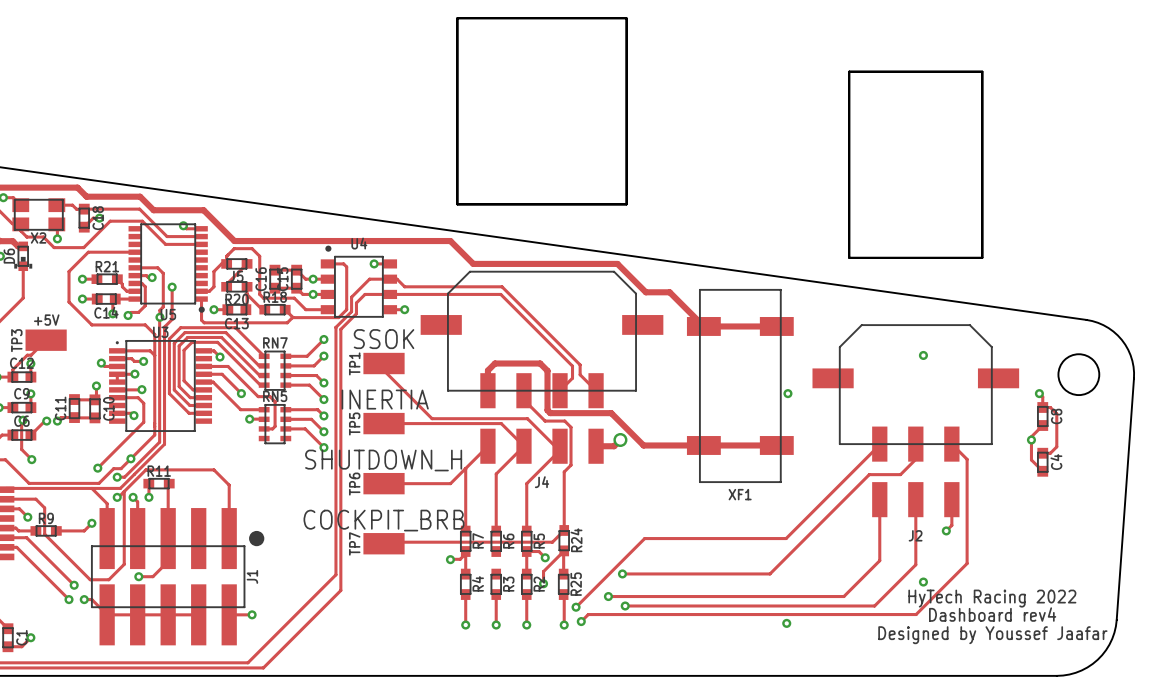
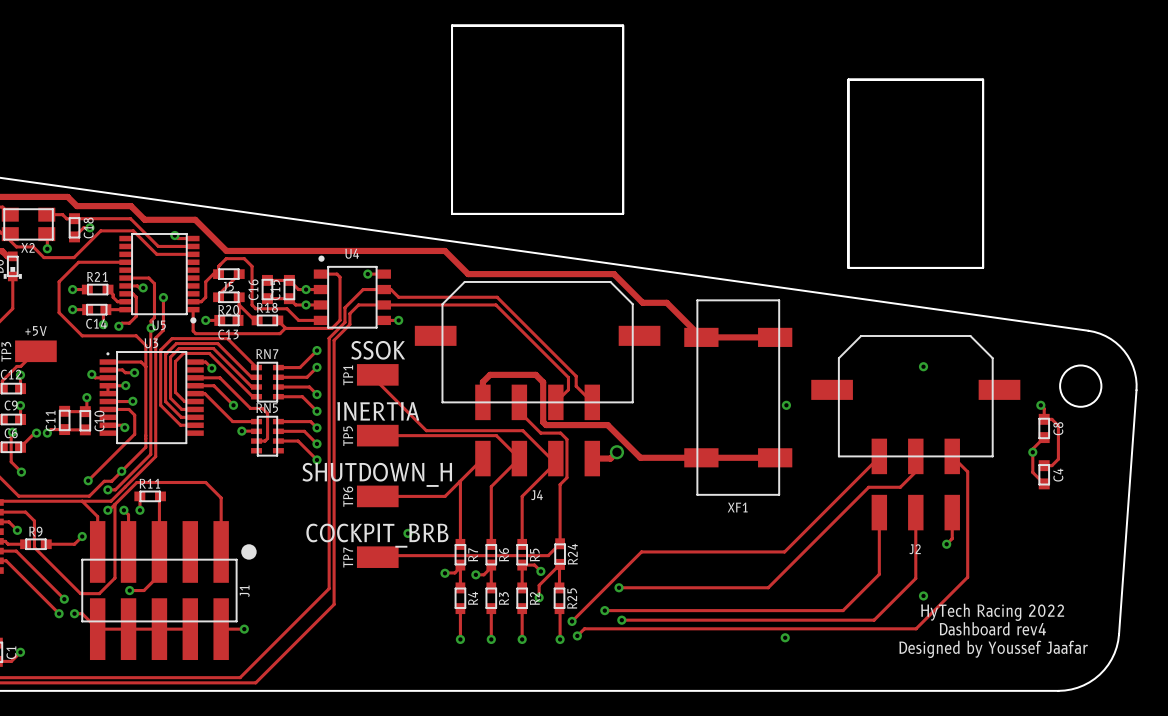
via: none -> (407, 533)
track: none -> (491, 565) (491, 587)
track: none -> (491, 567) (483, 574) (475, 574)
via: none -> (475, 574)

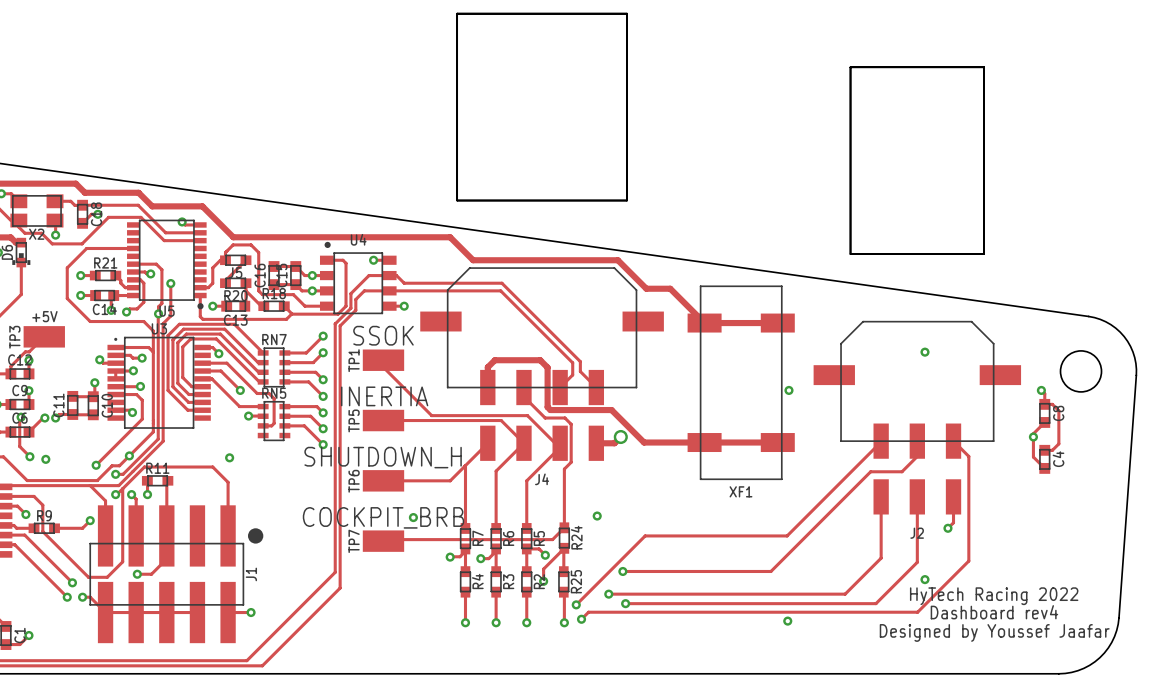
via: none -> (229, 457)
via: none -> (45, 459)
via: none -> (597, 516)

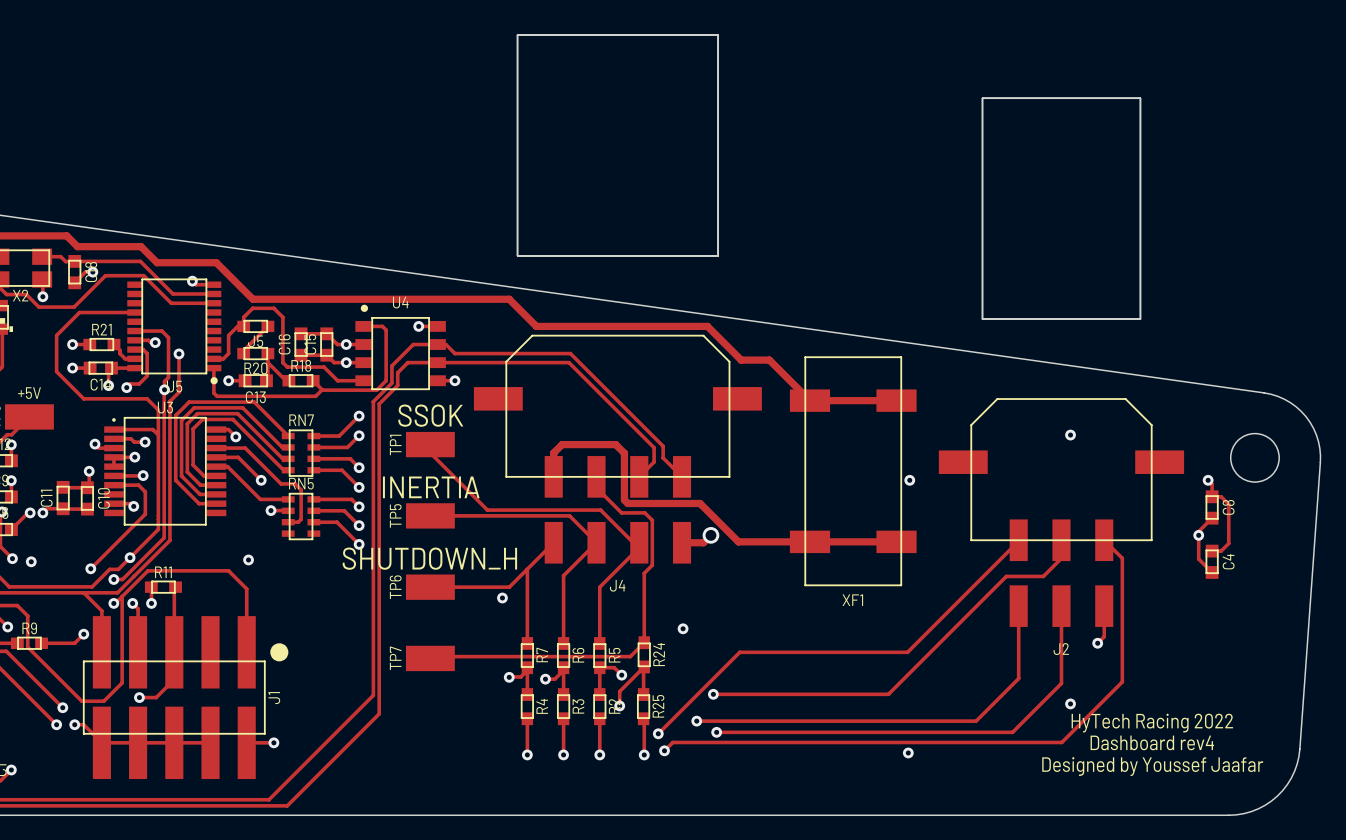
text: COCKPIT_BRB (383, 517) -> none
via position: (413, 517) -> (502, 598)

